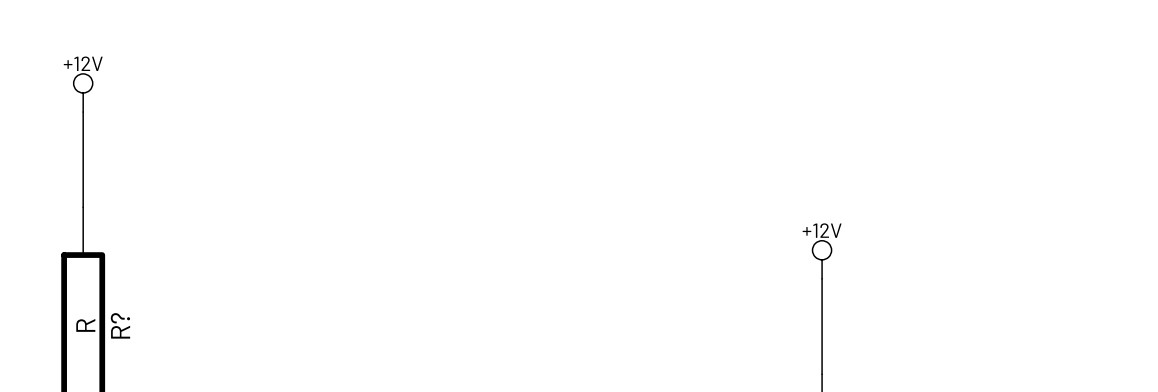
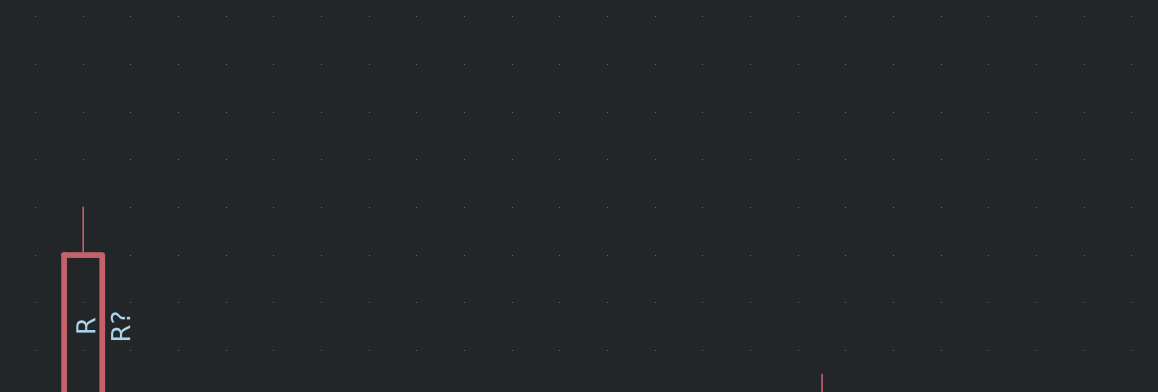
power symbol: +12V (83, 92) -> none
wire: (83, 112) (83, 207) -> none
power symbol: +12V (822, 259) -> none
wire: (822, 278) (822, 374) -> none

